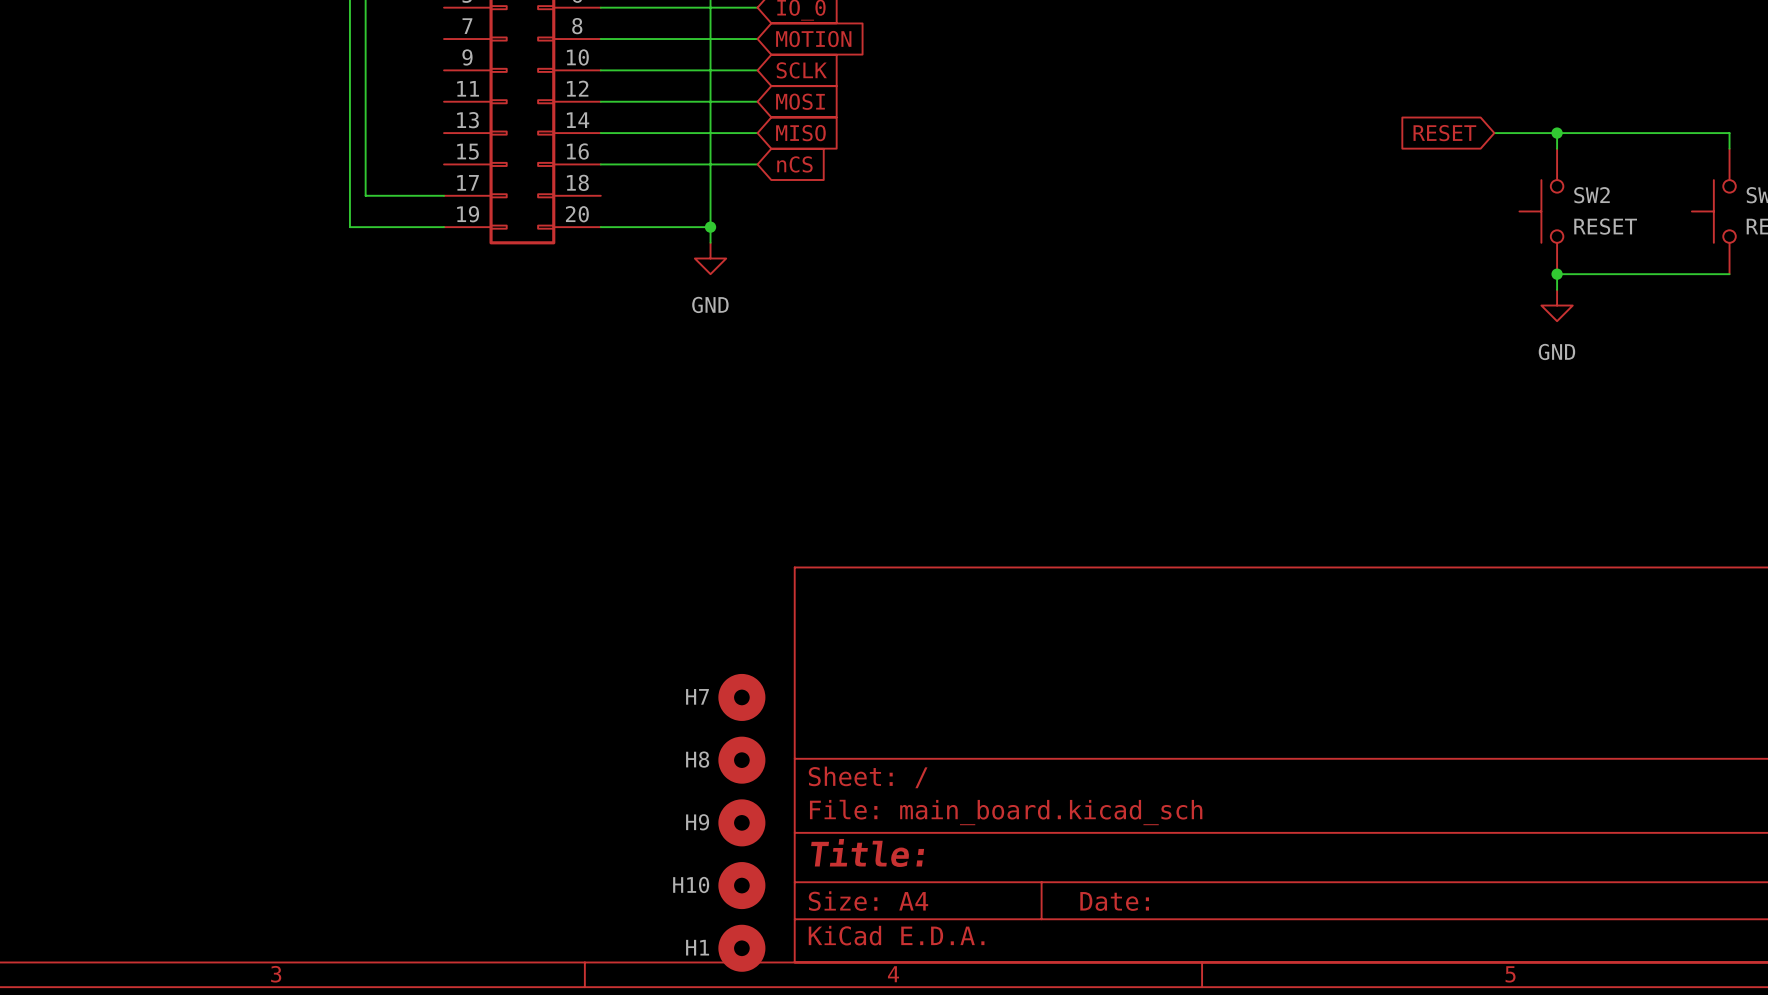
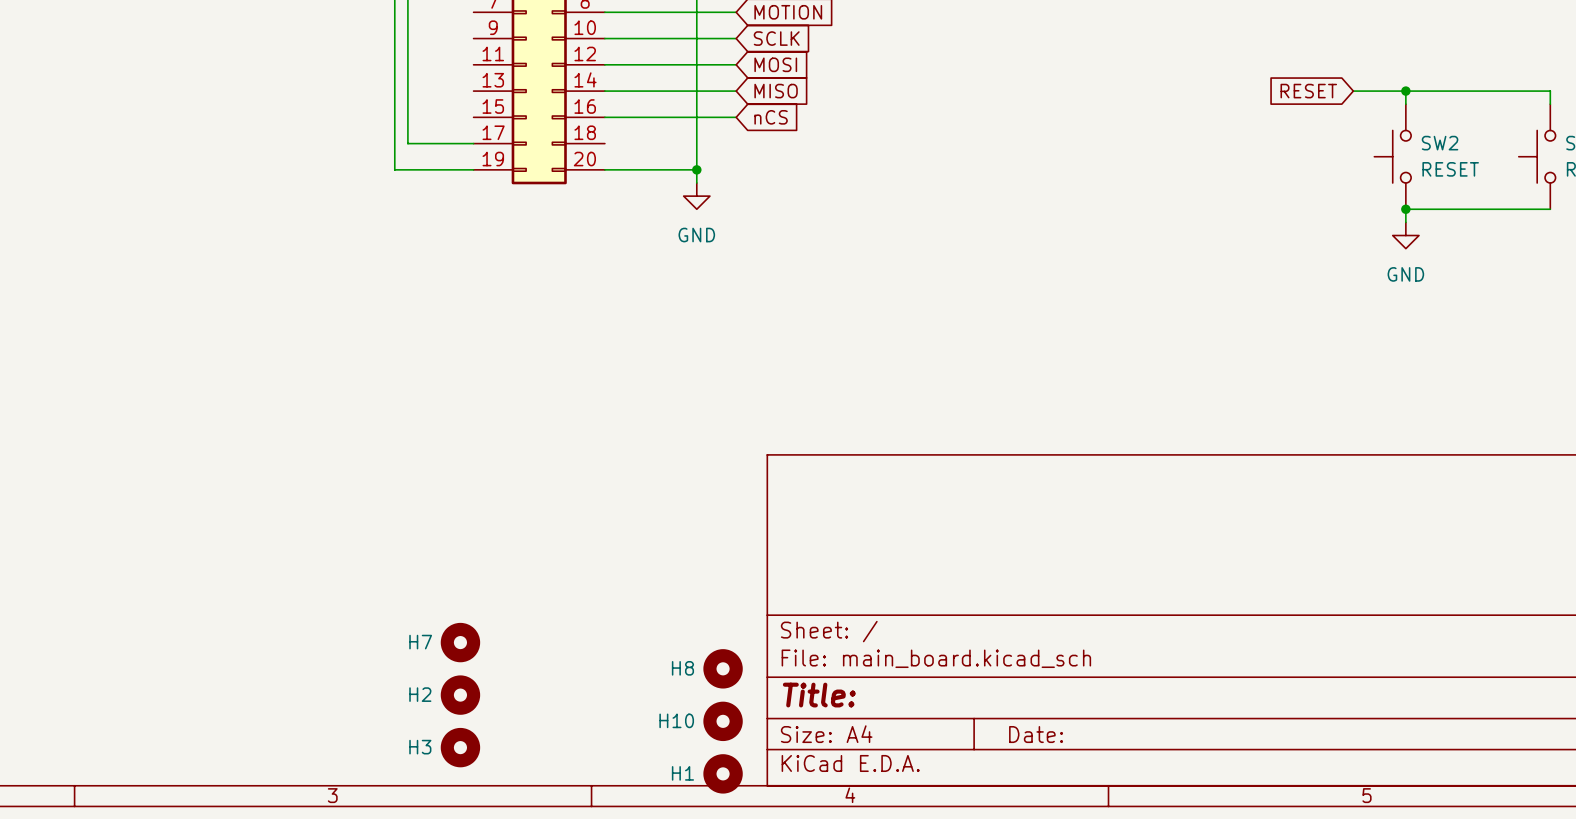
H7 position: (741, 697) -> (460, 642)
H8: (741, 760) -> none
H9 name: H9 (697, 822) -> H8 (682, 668)
H2: none -> (460, 695)
H3: none -> (460, 747)

